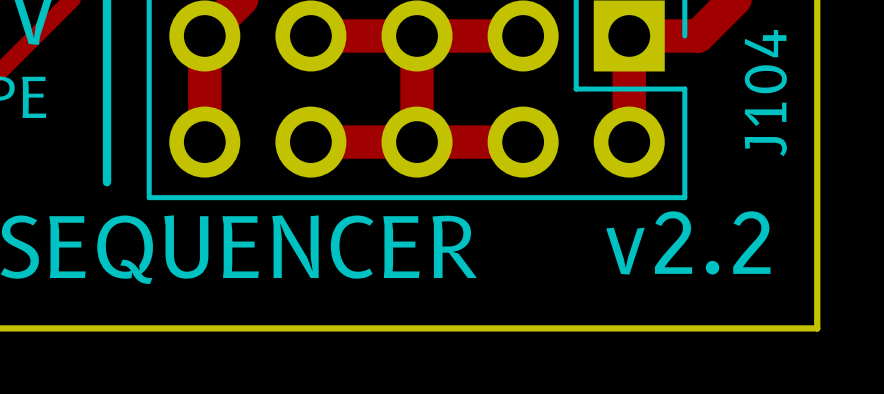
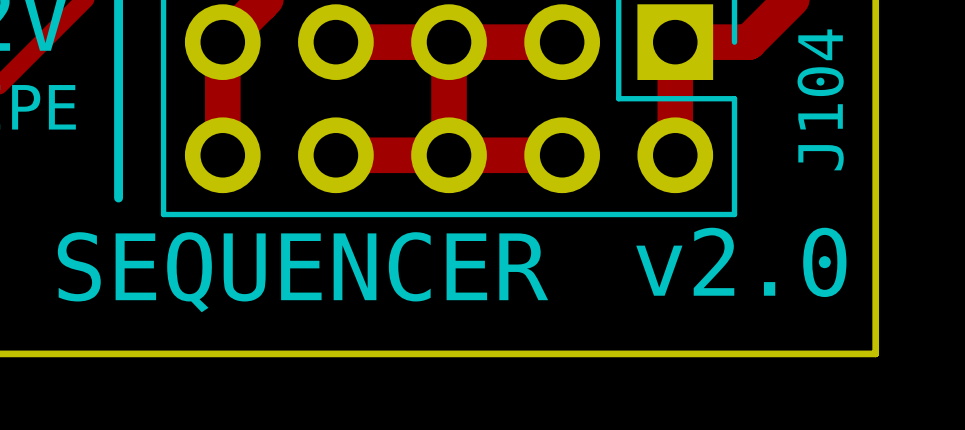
text: v2.2 (688, 242) -> v2.0 (741, 262)

